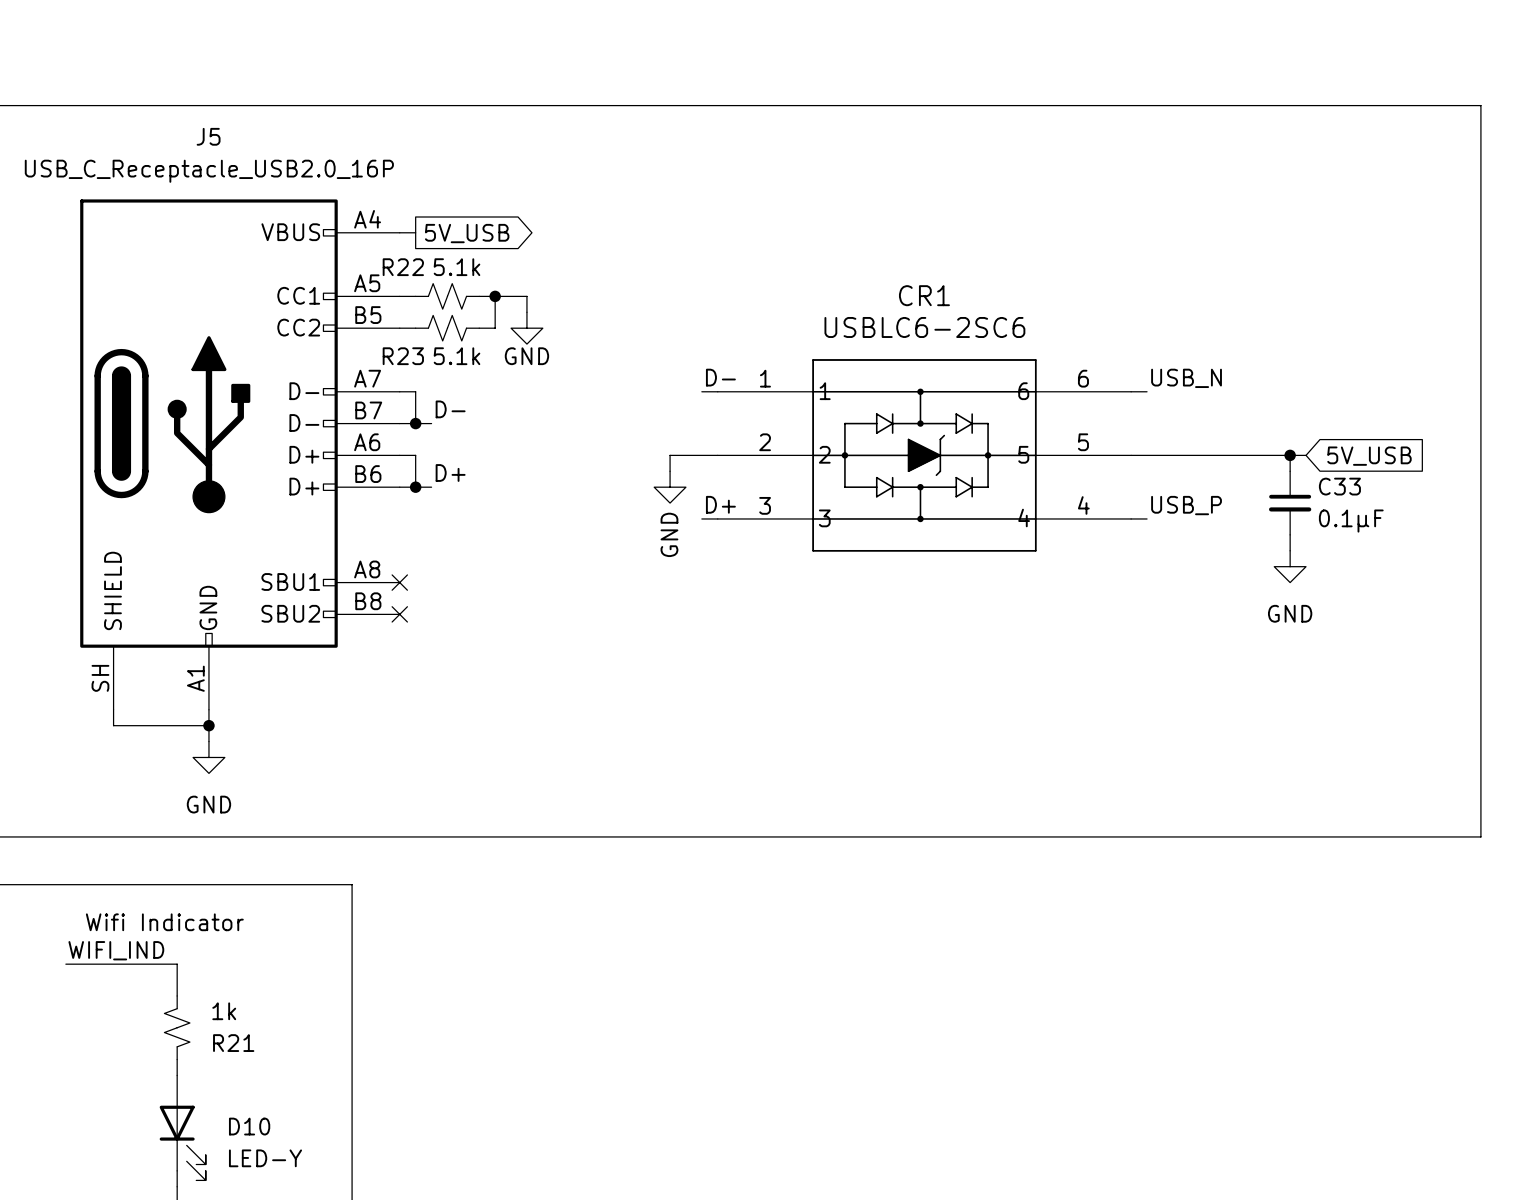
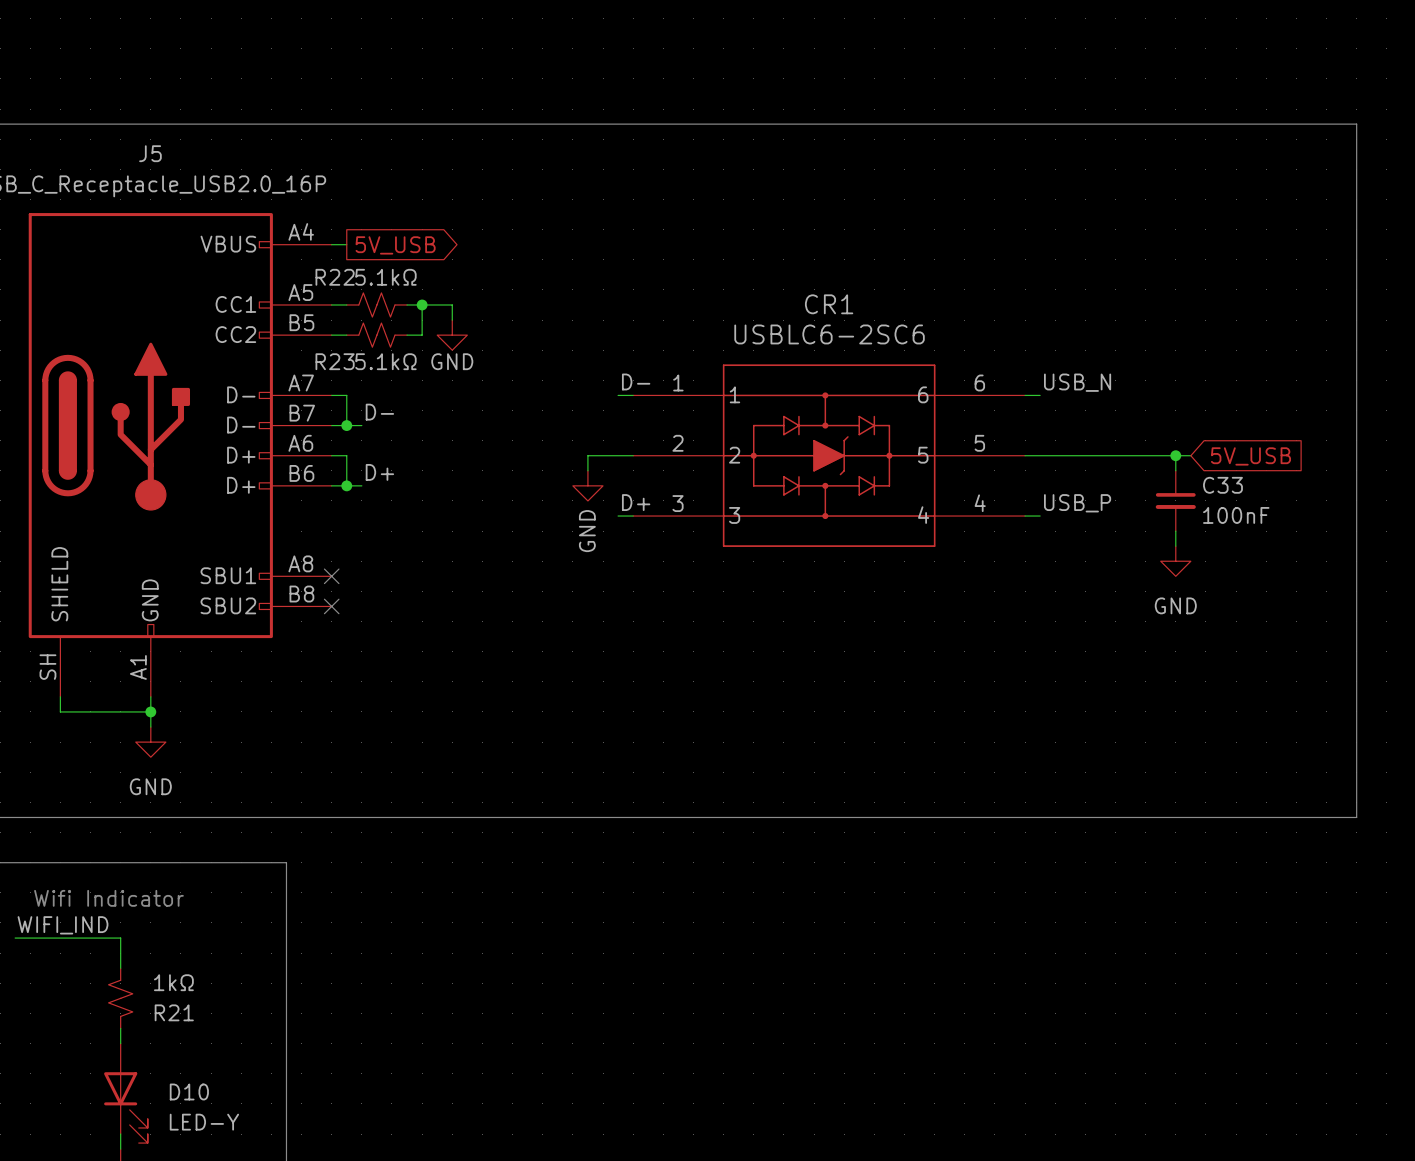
R22 value: 5.1k (457, 267) -> 5.1kΩ (385, 277)
R23 value: 5.1k (457, 356) -> 5.1kΩ (385, 361)
C33 value: 0.1μF (1351, 521) -> 100nF (1236, 515)
R21 value: 1k (224, 1011) -> 1kΩ (173, 982)

